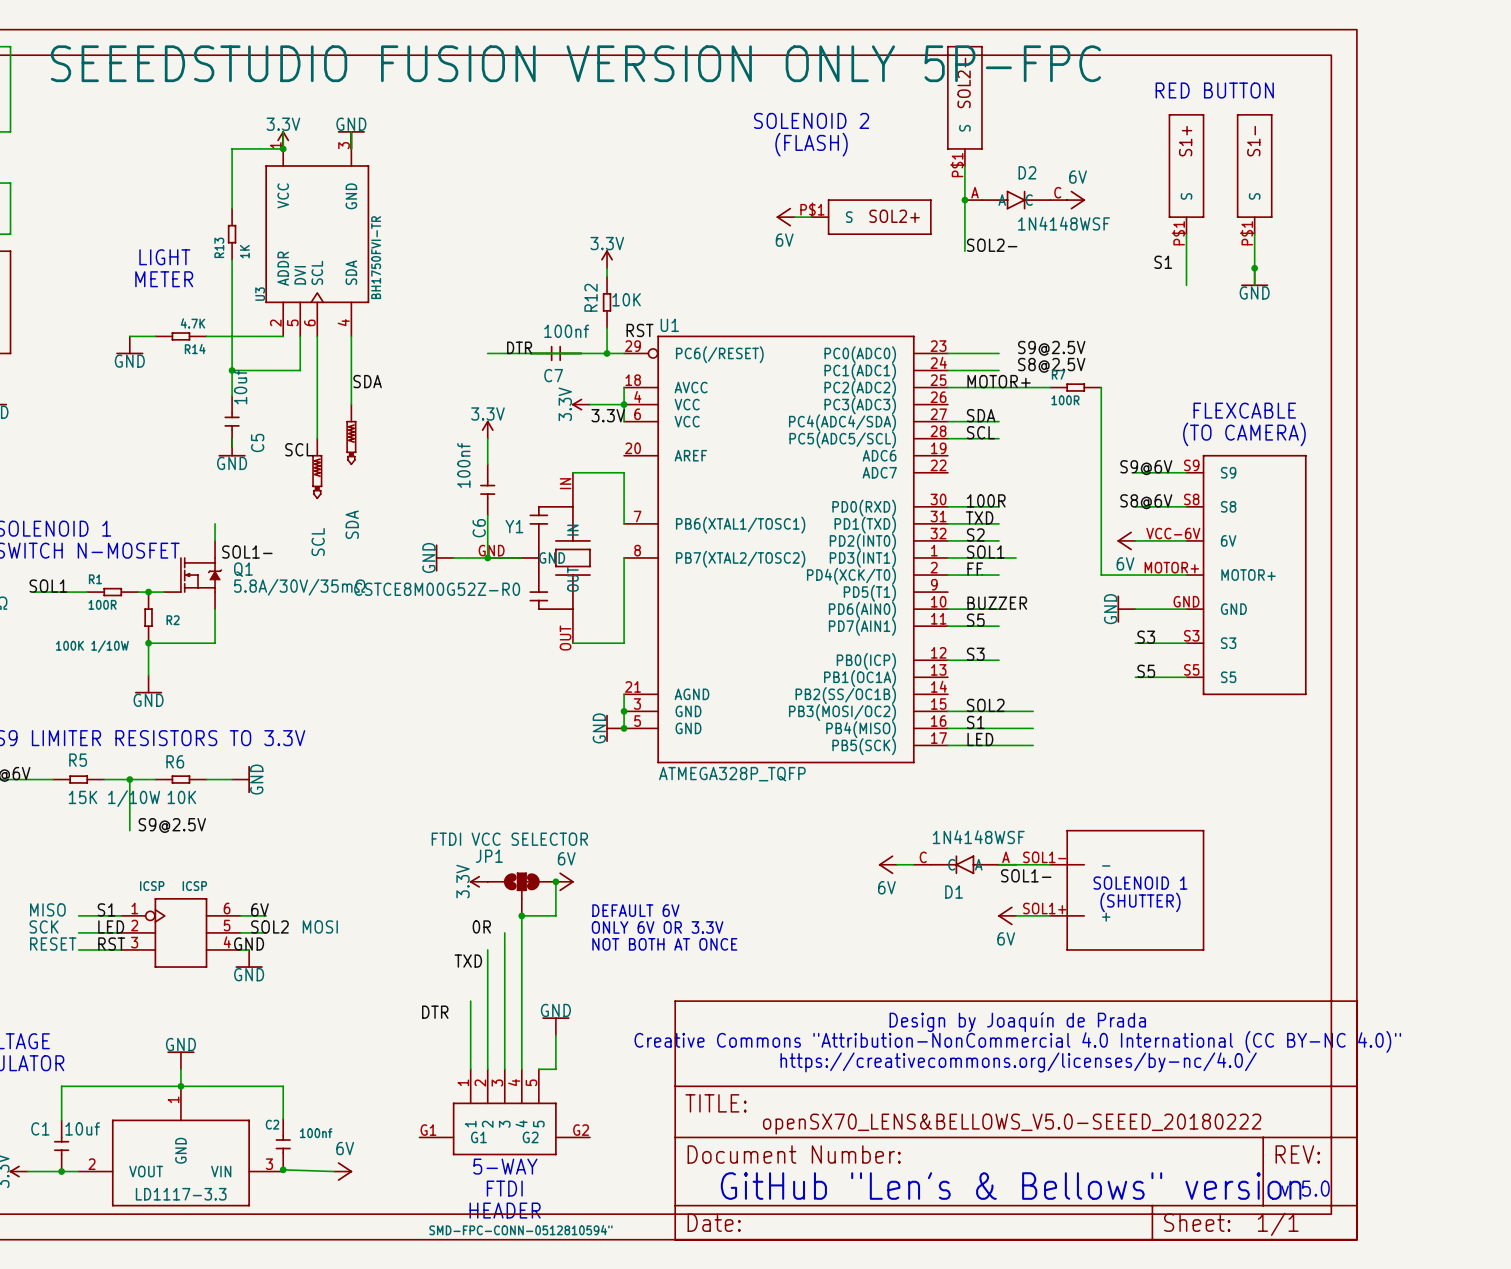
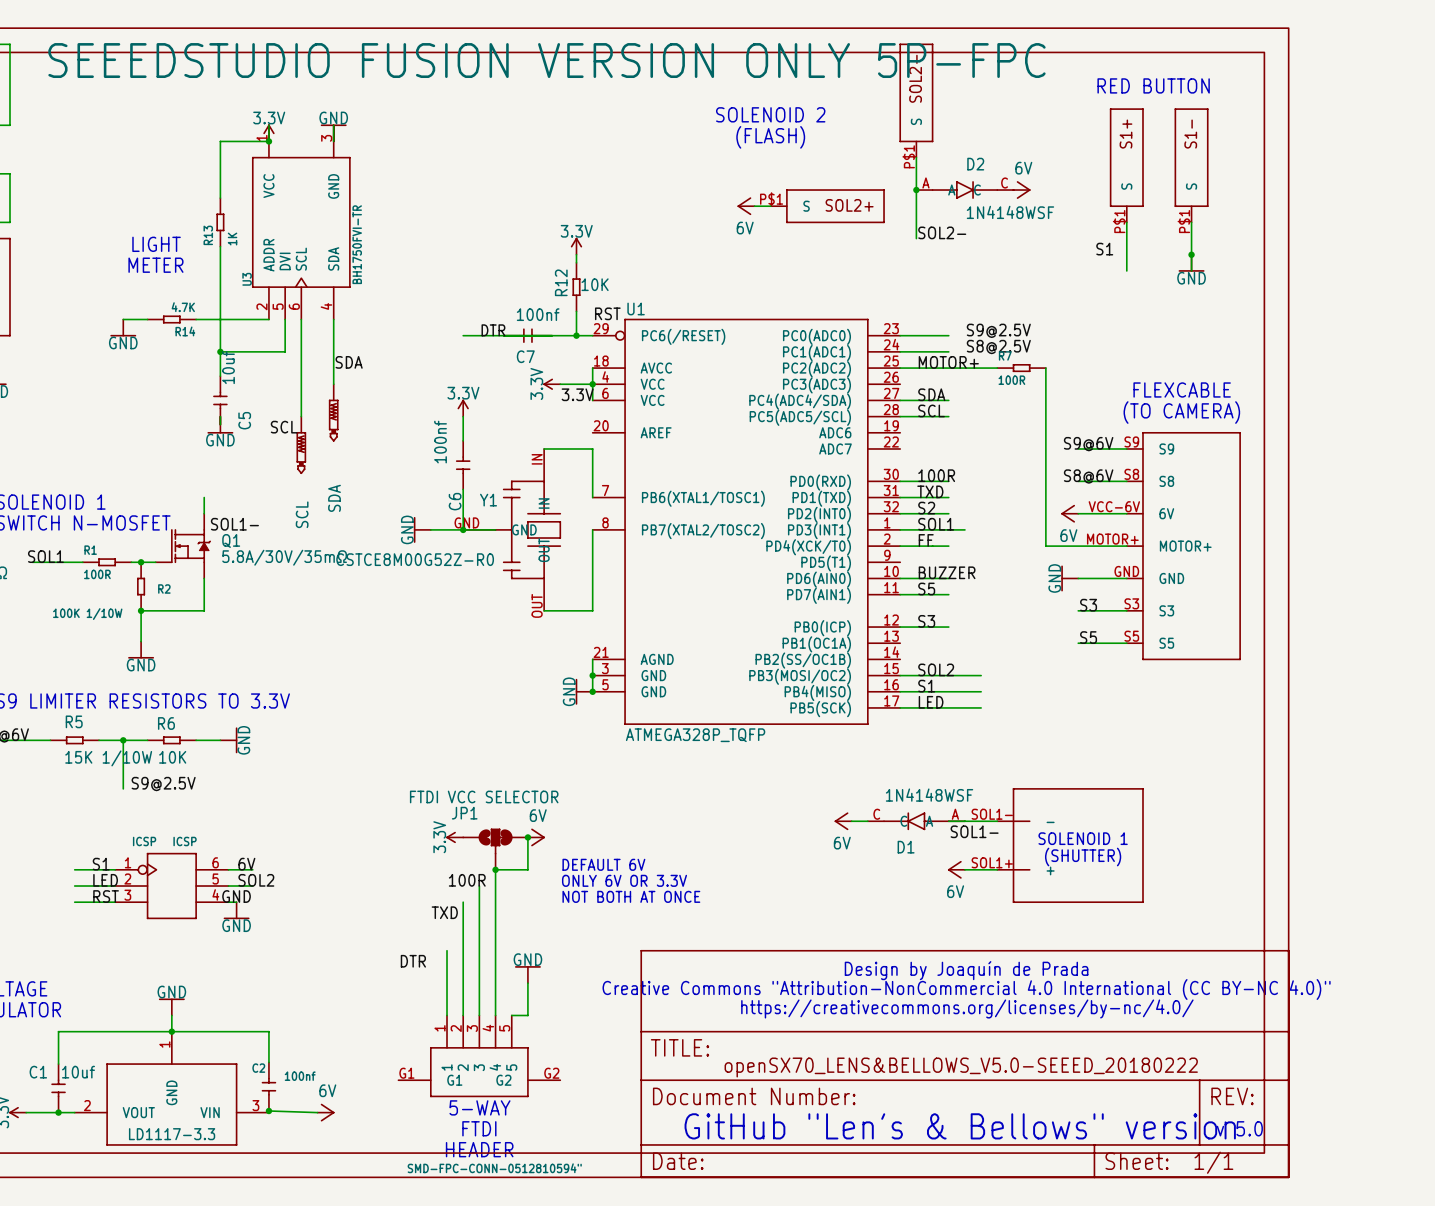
text: MISO (47, 909) -> none
text: SCK (44, 926) -> none
text: MOSI (320, 926) -> none
label: 0R (481, 926) -> 100R (467, 880)
text: RESET (53, 944) -> none

